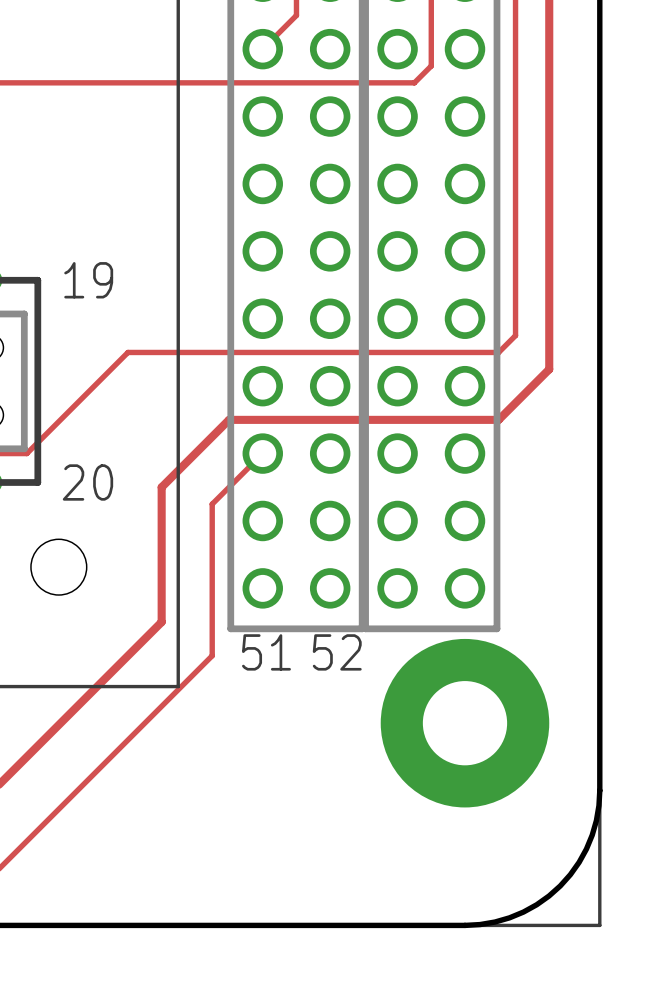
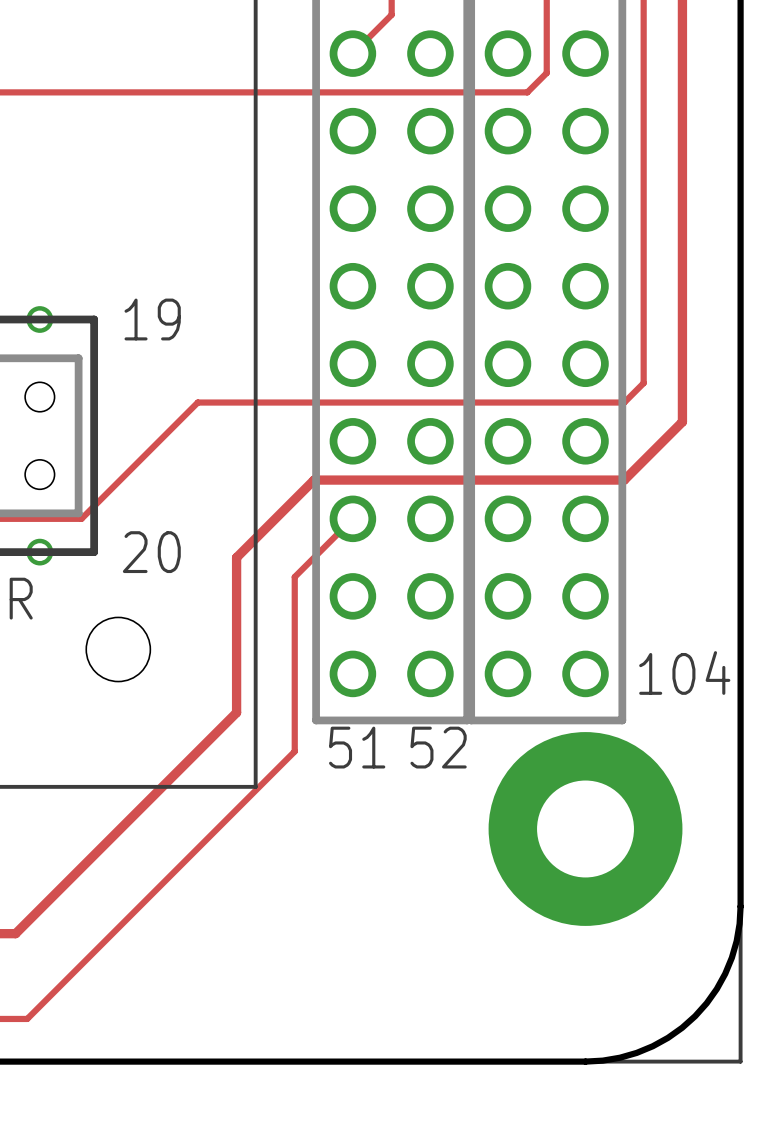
part text: none -> 104 (684, 672)

